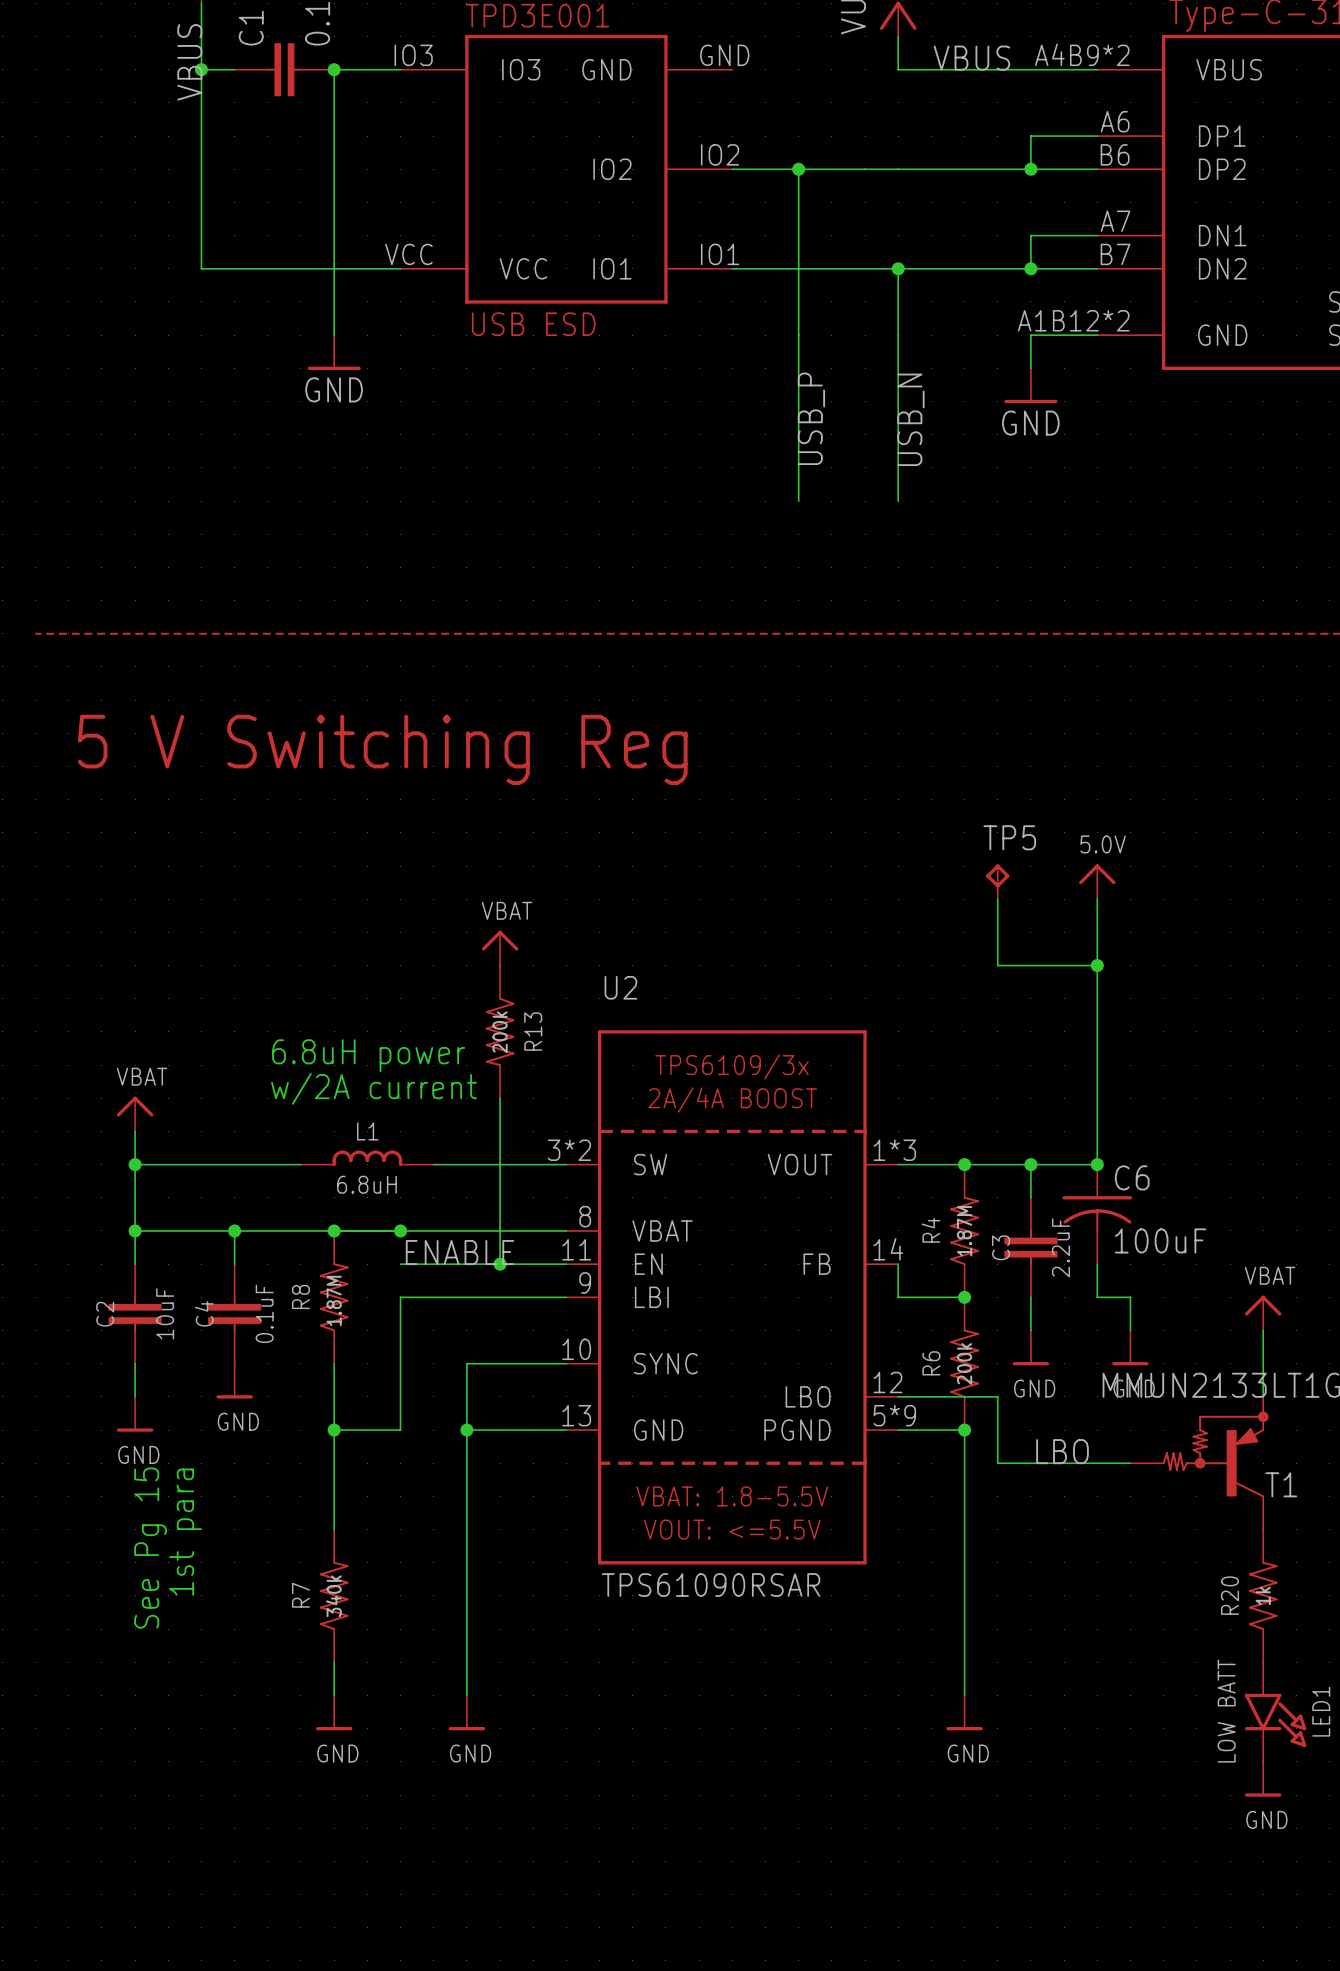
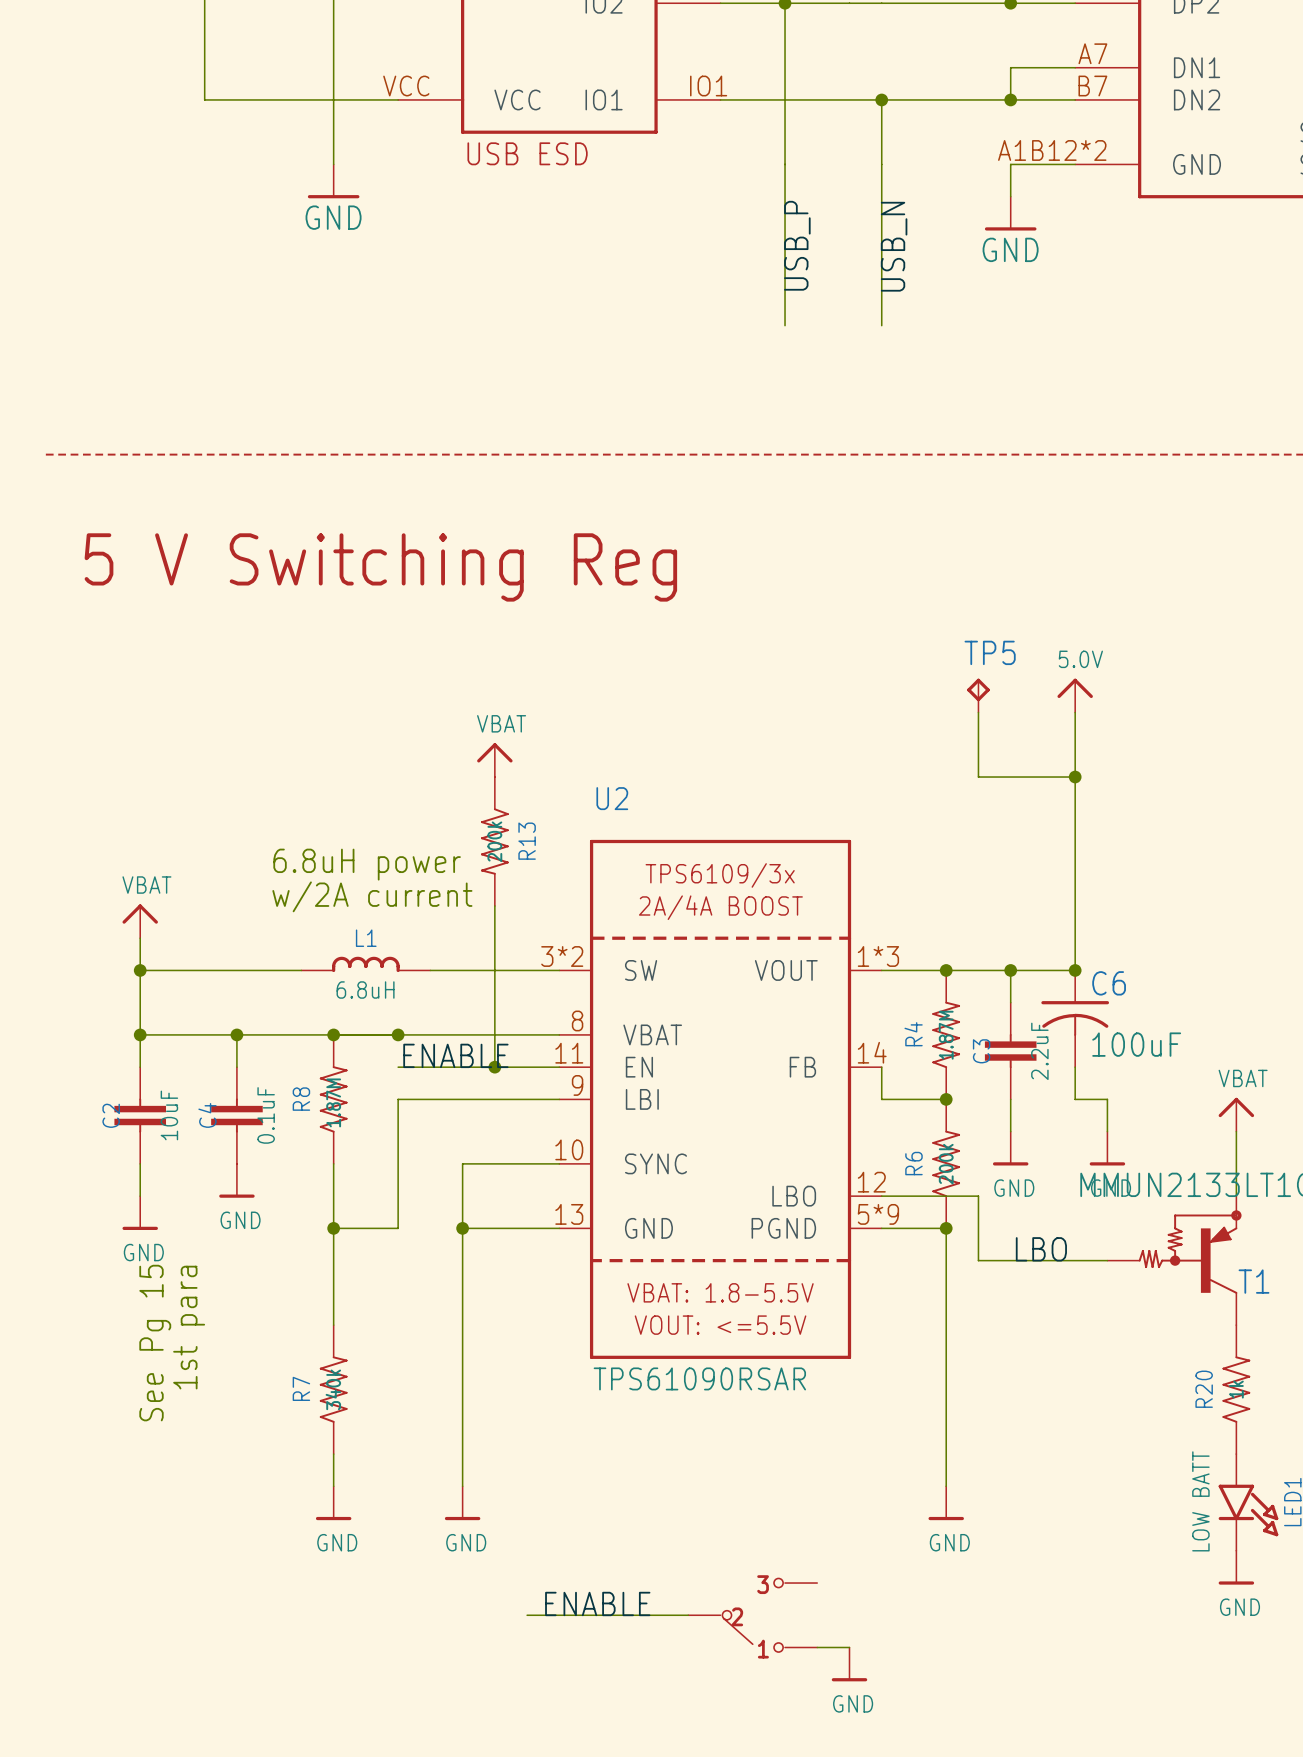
label: none -> ENABLE (597, 1603)
wire: none -> (527, 1615) (688, 1615)
part: none -> (752, 1615)
wire: none -> (817, 1647) (849, 1647)
power symbol: none -> GND (849, 1664)

